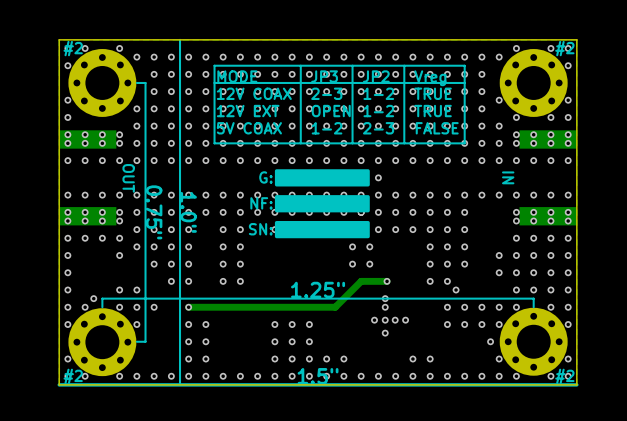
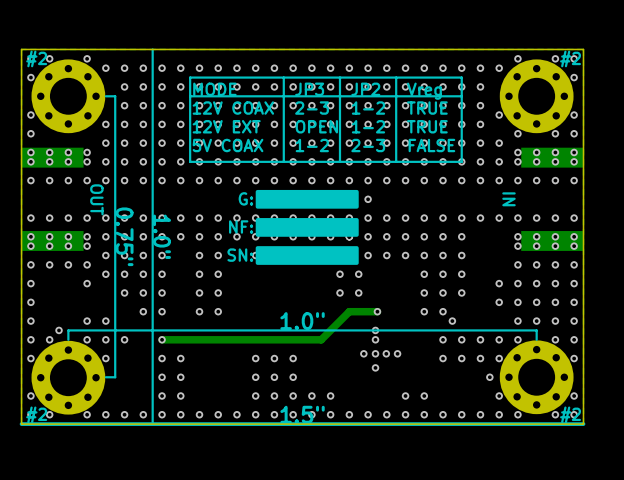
text: 1.25" (318, 290) -> 1.0" (302, 321)

